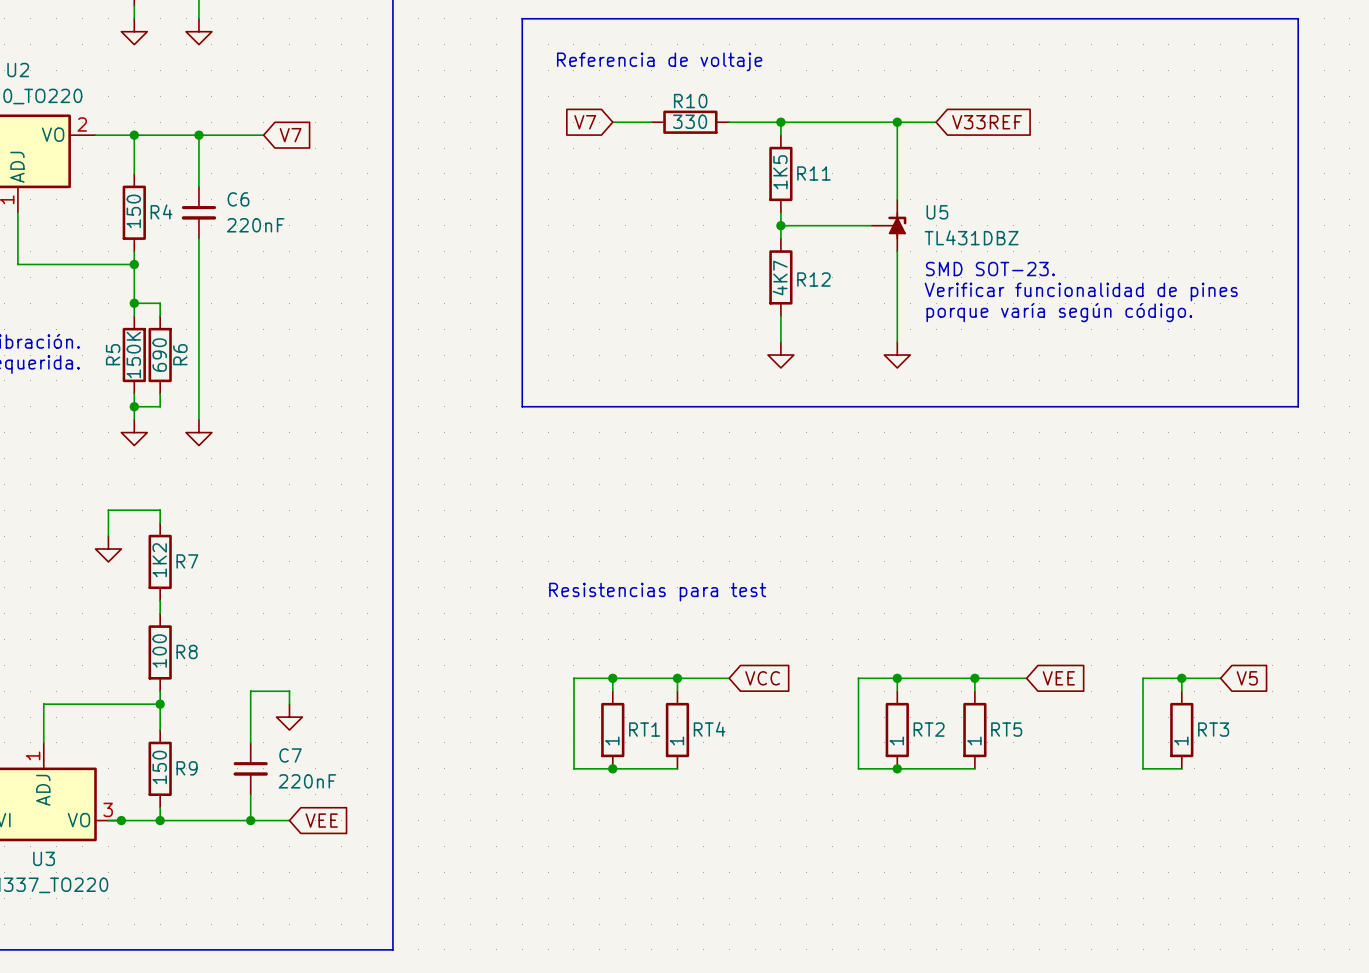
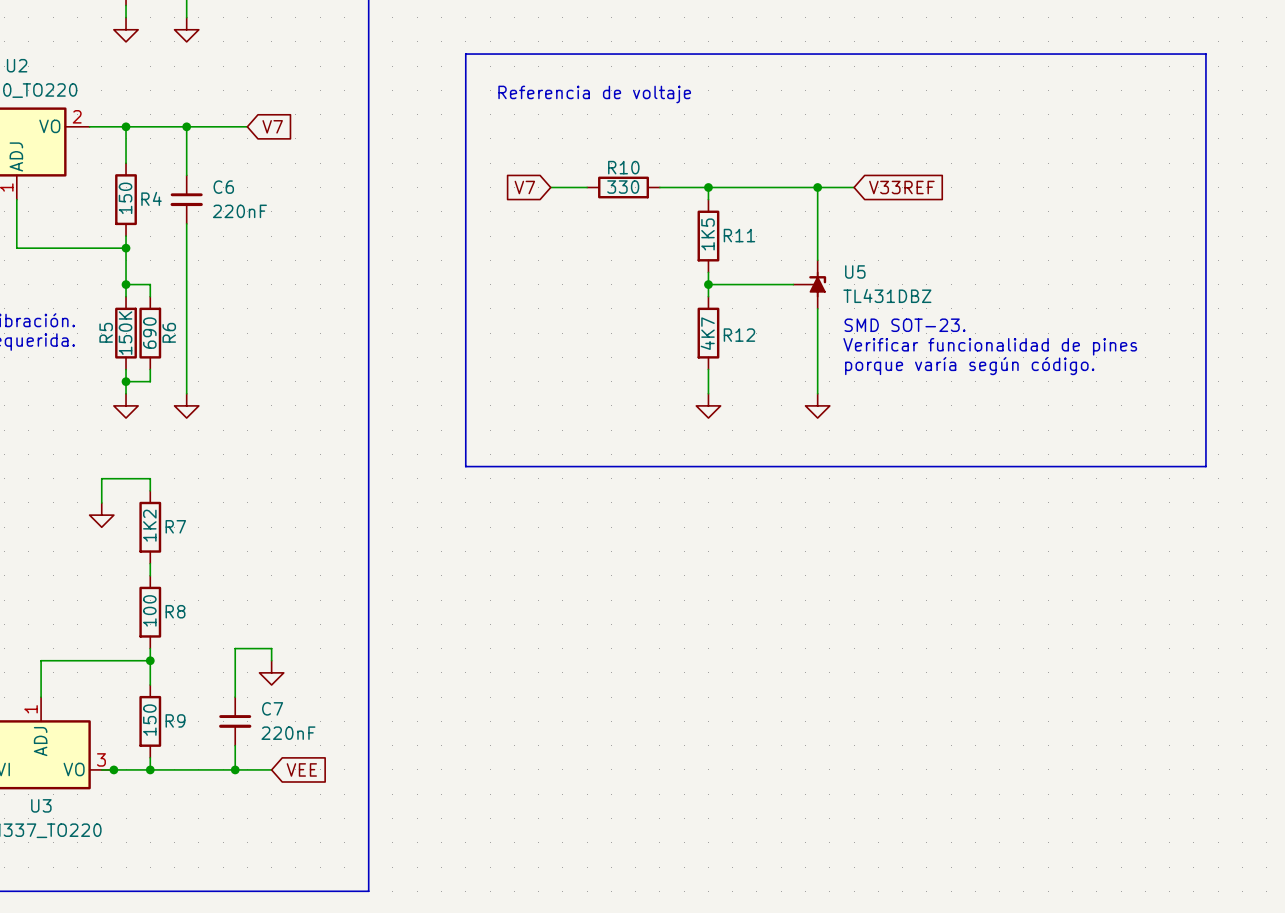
line: (522, 18) (1298, 18) (1298, 406) (522, 406) (522, 18) -> (465, 54) (465, 466) (1205, 466) (1205, 54) (465, 54)
text position: Referencia de voltaje (659, 61) -> Referencia de voltaje (594, 94)
global label position: V7 (585, 122) -> V7 (524, 187)
wire: (612, 122) (651, 122) -> (550, 187) (587, 187)
R10 position: (690, 122) -> (623, 187)
wire: (729, 122) (936, 122) -> (659, 187) (854, 187)
wire: (780, 122) (780, 135) -> (708, 187) (708, 199)
junction: (780, 122) -> none
wire: (897, 122) (897, 199) -> (817, 187) (817, 260)
junction: (897, 122) -> none
global label position: V33REF (987, 122) -> V33REF (901, 187)
R11 position: (780, 173) -> (708, 236)
junction: none -> (817, 187)
wire: (780, 212) (780, 238) -> (708, 272) (708, 296)
wire: (780, 225) (871, 225) -> (708, 284) (793, 284)
junction position: (780, 225) -> (708, 187)
U5 position: (888, 225) -> (809, 284)
wire: (897, 251) (897, 342) -> (817, 308) (817, 393)
text position: SMD SOT-23. (990, 269) -> SMD SOT-23. (905, 325)
R12 position: (780, 277) -> (708, 333)
text position: Verificar funcionalidad de pines (1081, 292) -> Verificar funcionalidad de pines (990, 346)
junction: none -> (708, 284)
text position: porque varía según código. (1059, 312) -> porque varía según código. (969, 366)
wire: (780, 316) (780, 342) -> (708, 369) (708, 393)
power symbol: (780, 355) -> none
power symbol: (897, 355) -> none
power symbol: none -> (708, 405)
power symbol: none -> (817, 405)
text: Resistencias para test (657, 592) -> none
wire: (612, 678) (612, 691) -> none
junction: (612, 678) -> none
wire: (677, 678) (677, 691) -> none
junction: (677, 678) -> none
wire: (729, 678) (573, 678) (573, 768) (677, 768) -> none
global label: VCC (762, 678) -> none
wire: (897, 678) (897, 691) -> none
junction: (897, 678) -> none
wire: (974, 678) (974, 691) -> none
junction: (974, 678) -> none
wire: (1026, 678) (858, 678) (858, 768) (974, 768) -> none
global label: VEE (1058, 678) -> none
wire: (1181, 678) (1181, 691) -> none
junction: (1181, 678) -> none
wire: (1220, 678) (1143, 678) (1143, 768) (1181, 768) -> none
global label: V5 (1247, 678) -> none
RT1: 1 (612, 730) -> none
RT4: 1 (677, 730) -> none
RT2: 1 (897, 730) -> none
RT5: 1 (974, 730) -> none
RT3: 1 (1181, 730) -> none
junction: (612, 768) -> none
junction: (897, 768) -> none

